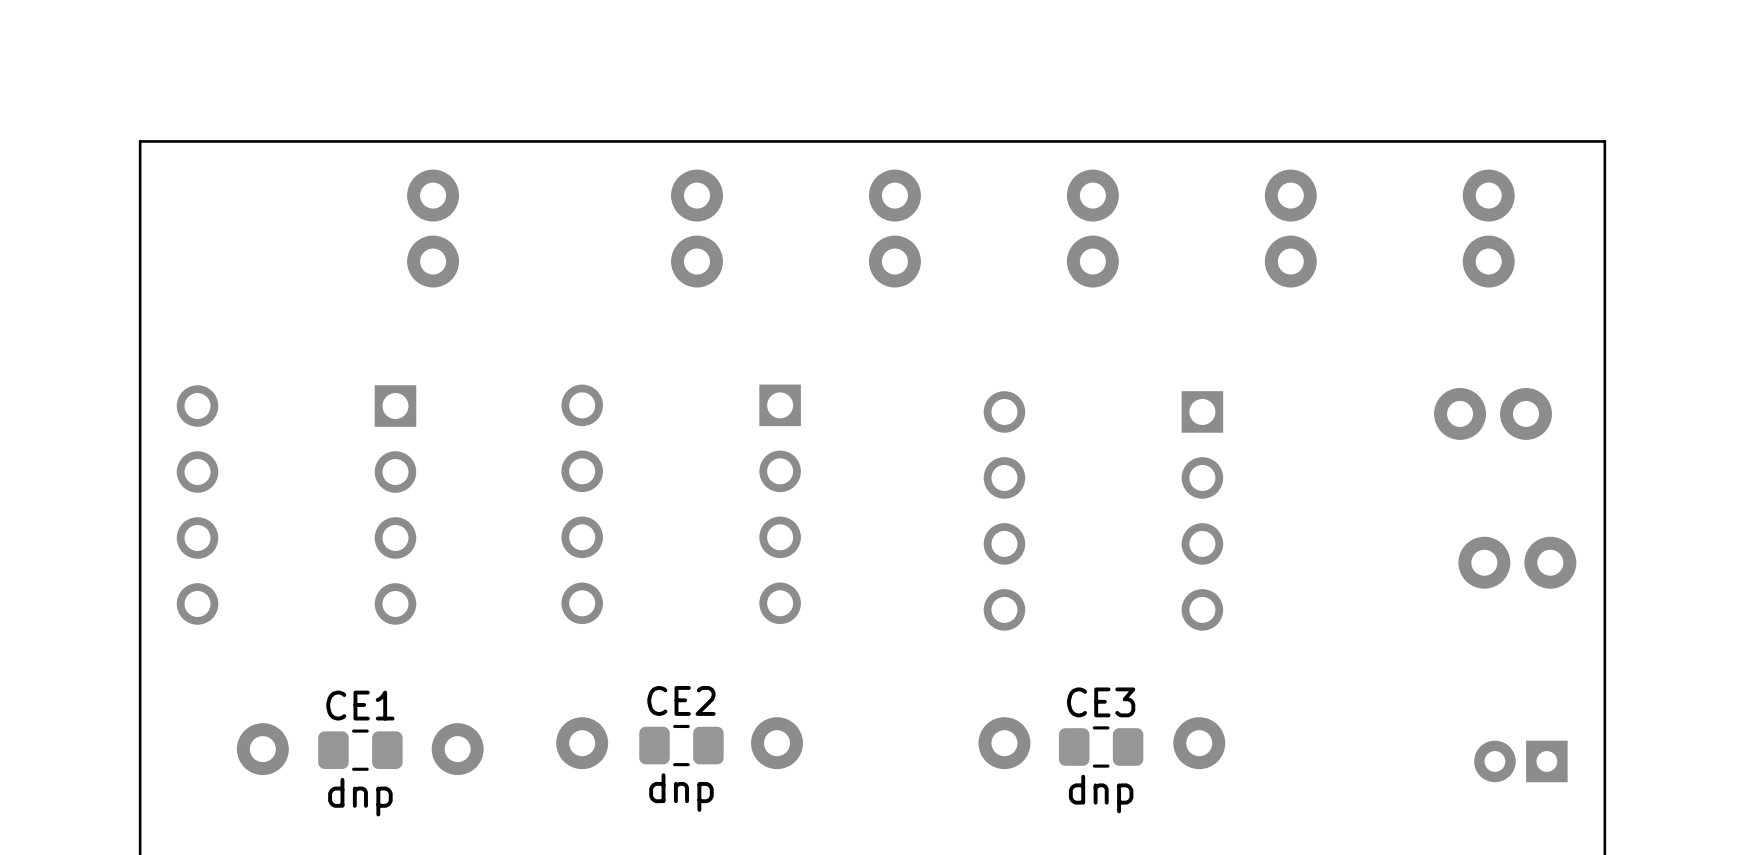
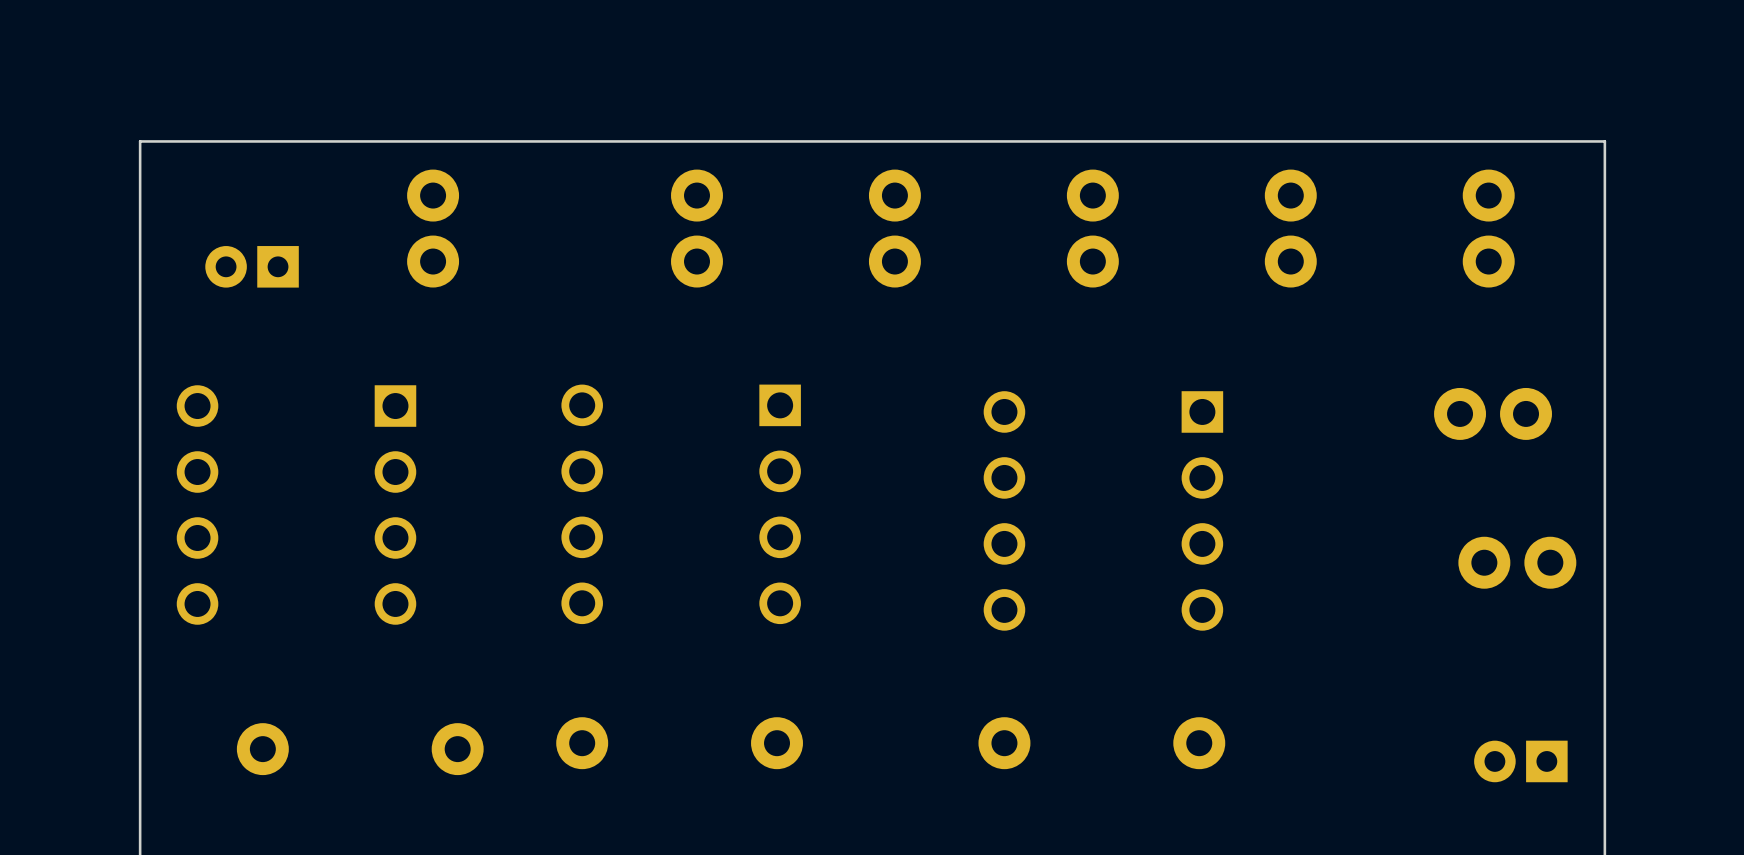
part: none -> (252, 266)
CE2: dnp (681, 745) -> none
CE3: dnp (1101, 747) -> none
CE1: dnp (360, 750) -> none

